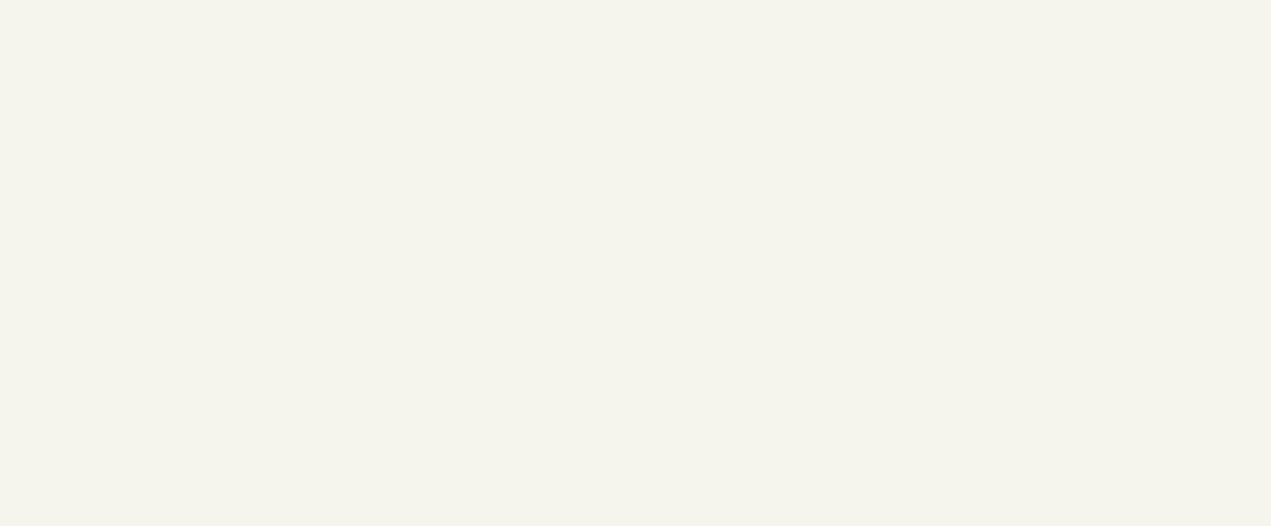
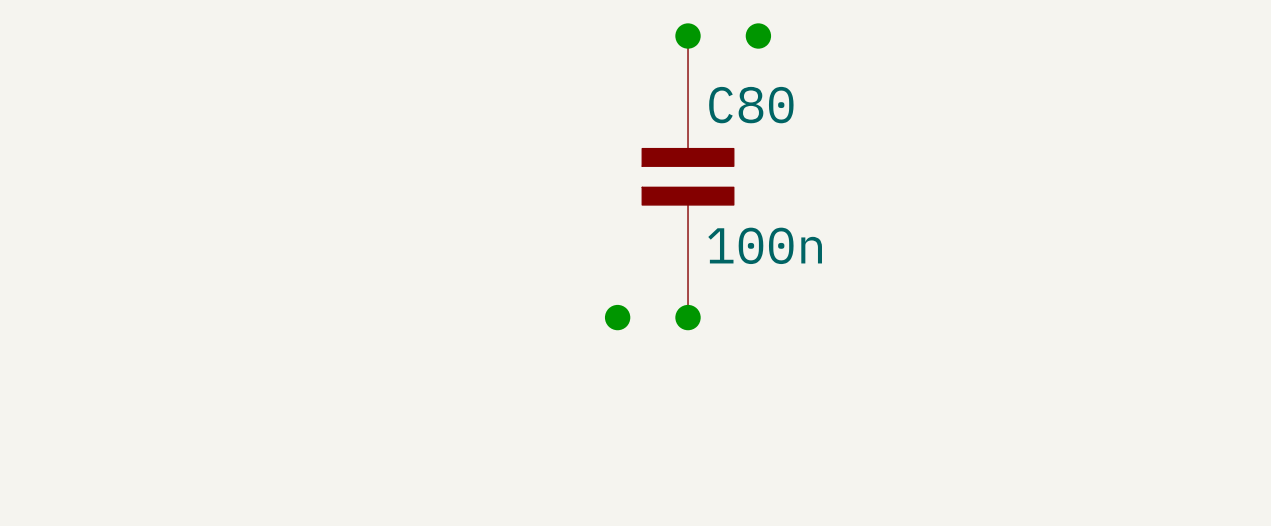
junction: none -> (688, 36)
junction: none -> (758, 36)
C80: none -> 100n (688, 176)
junction: none -> (617, 317)
junction: none -> (688, 317)

